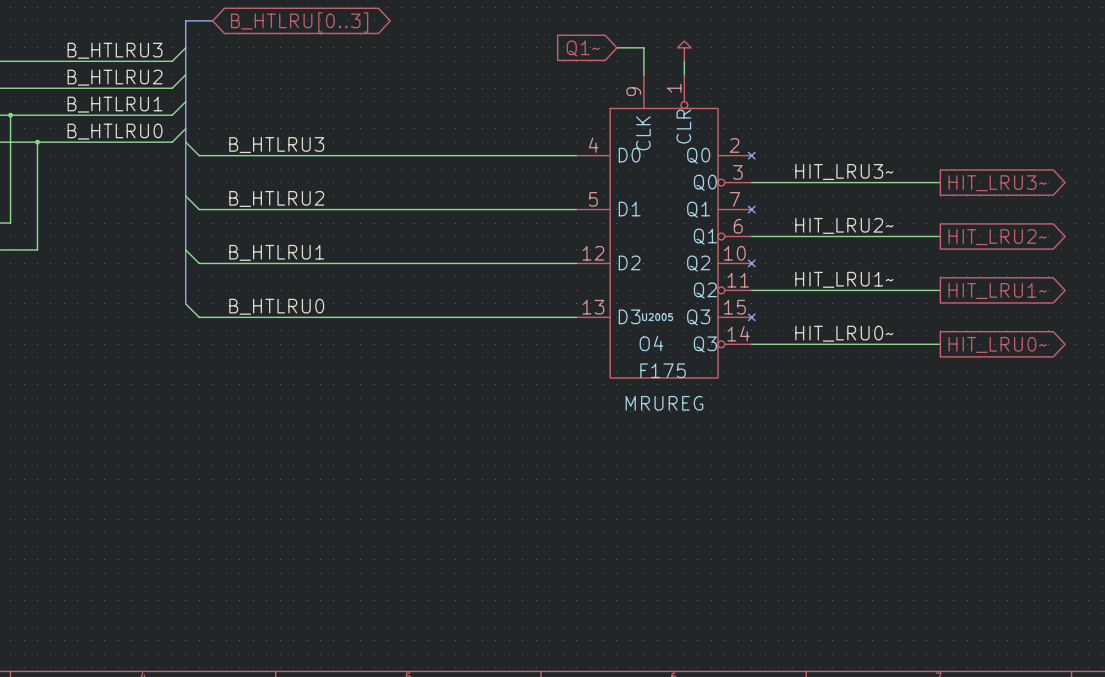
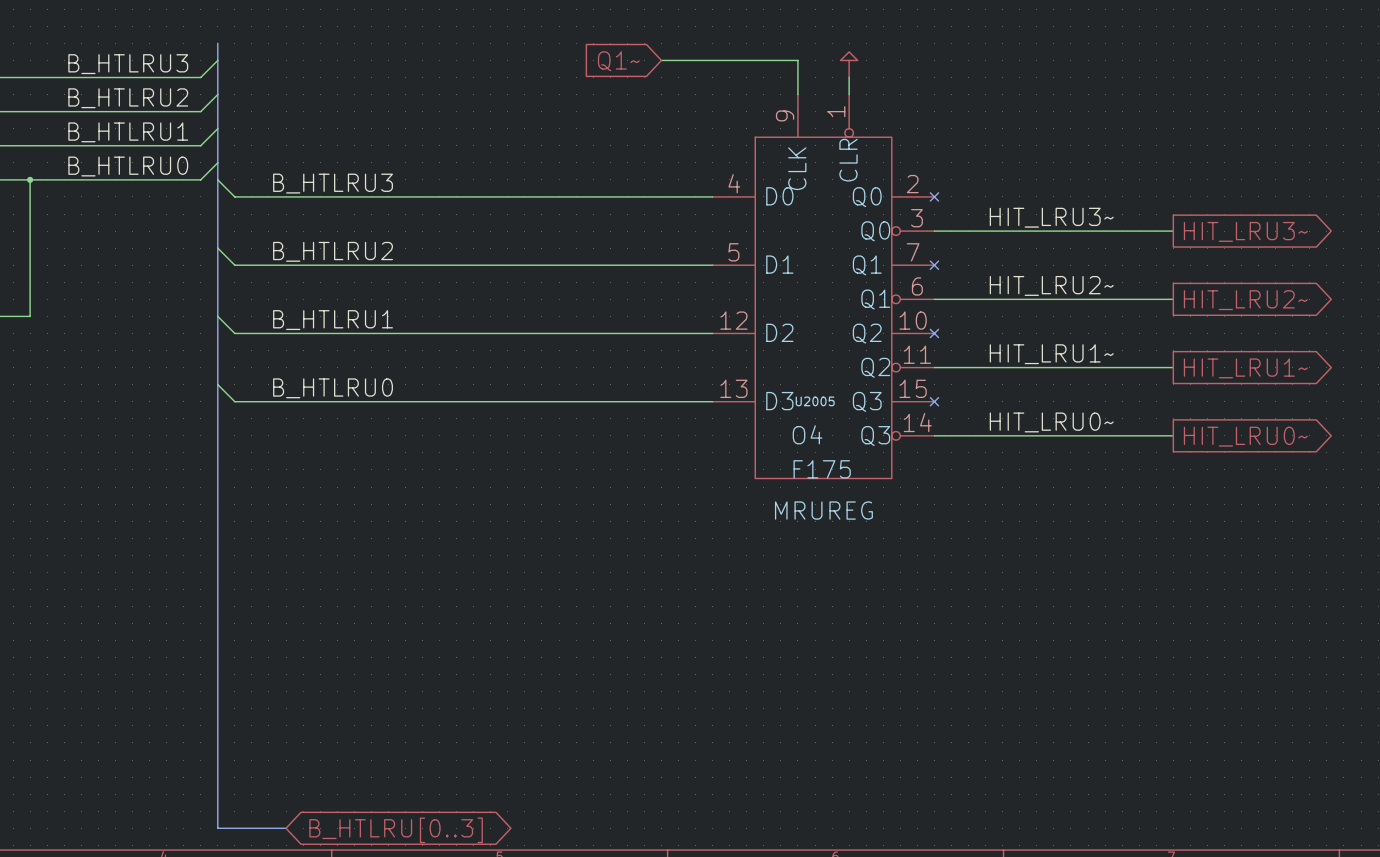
bus: (212, 20) (185, 20) (185, 34) -> none
global label: B_HTLRU[0..3] (299, 22) -> none
wire: none -> (661, 60) (763, 60)
global label position: Q1~ (583, 48) -> Q1~ (618, 61)
bus: none -> (217, 384) (217, 828) (286, 828)
global label: none -> B_HTLRU[0..3] (396, 830)

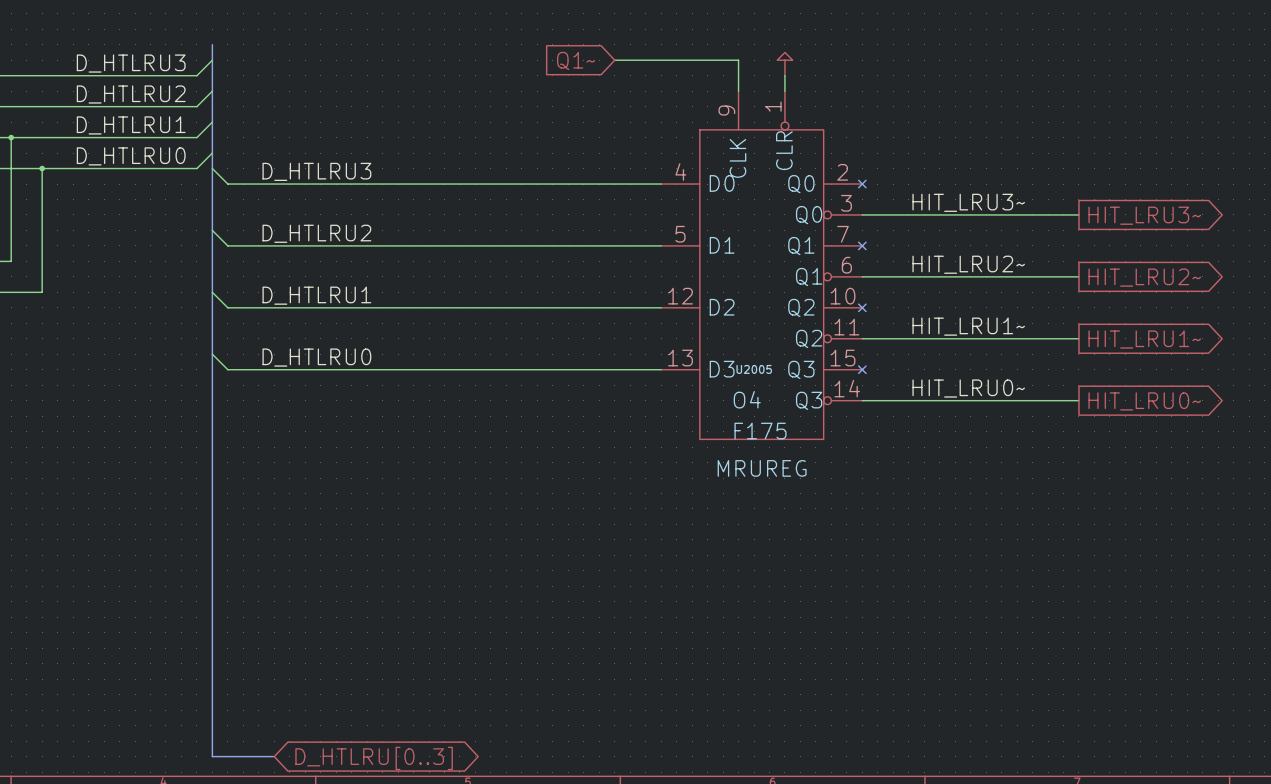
label: B_HTLRU3 (128, 64) -> D_HTLRU3 (131, 63)
label: B_HTLRU2 (128, 98) -> D_HTLRU2 (131, 94)
label: B_HTLRU1 (128, 132) -> D_HTLRU1 (131, 125)
label: B_HTLRU0 (128, 166) -> D_HTLRU0 (131, 156)
label: B_HTLRU3 (333, 183) -> D_HTLRU3 (316, 171)
label: B_HTLRU2 (333, 251) -> D_HTLRU2 (316, 233)
label: B_HTLRU1 (333, 320) -> D_HTLRU1 (316, 295)
label: B_HTLRU0 (333, 388) -> D_HTLRU0 (316, 357)
global label: B_HTLRU[0..3] (396, 830) -> D_HTLRU[0..3] (374, 758)

